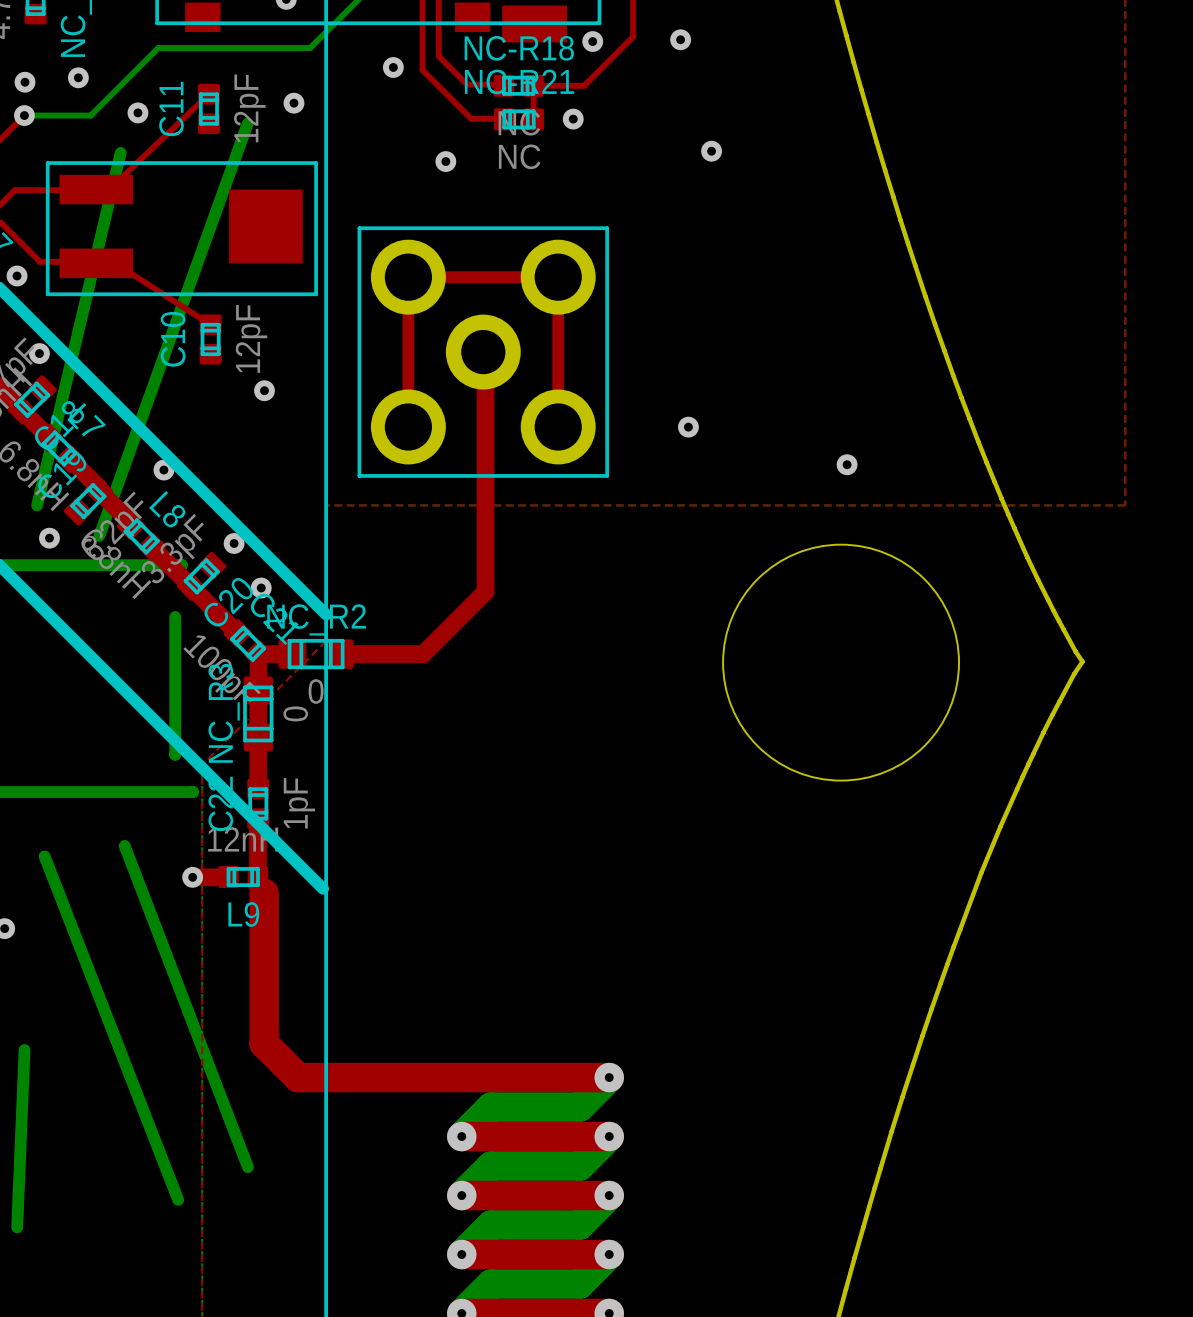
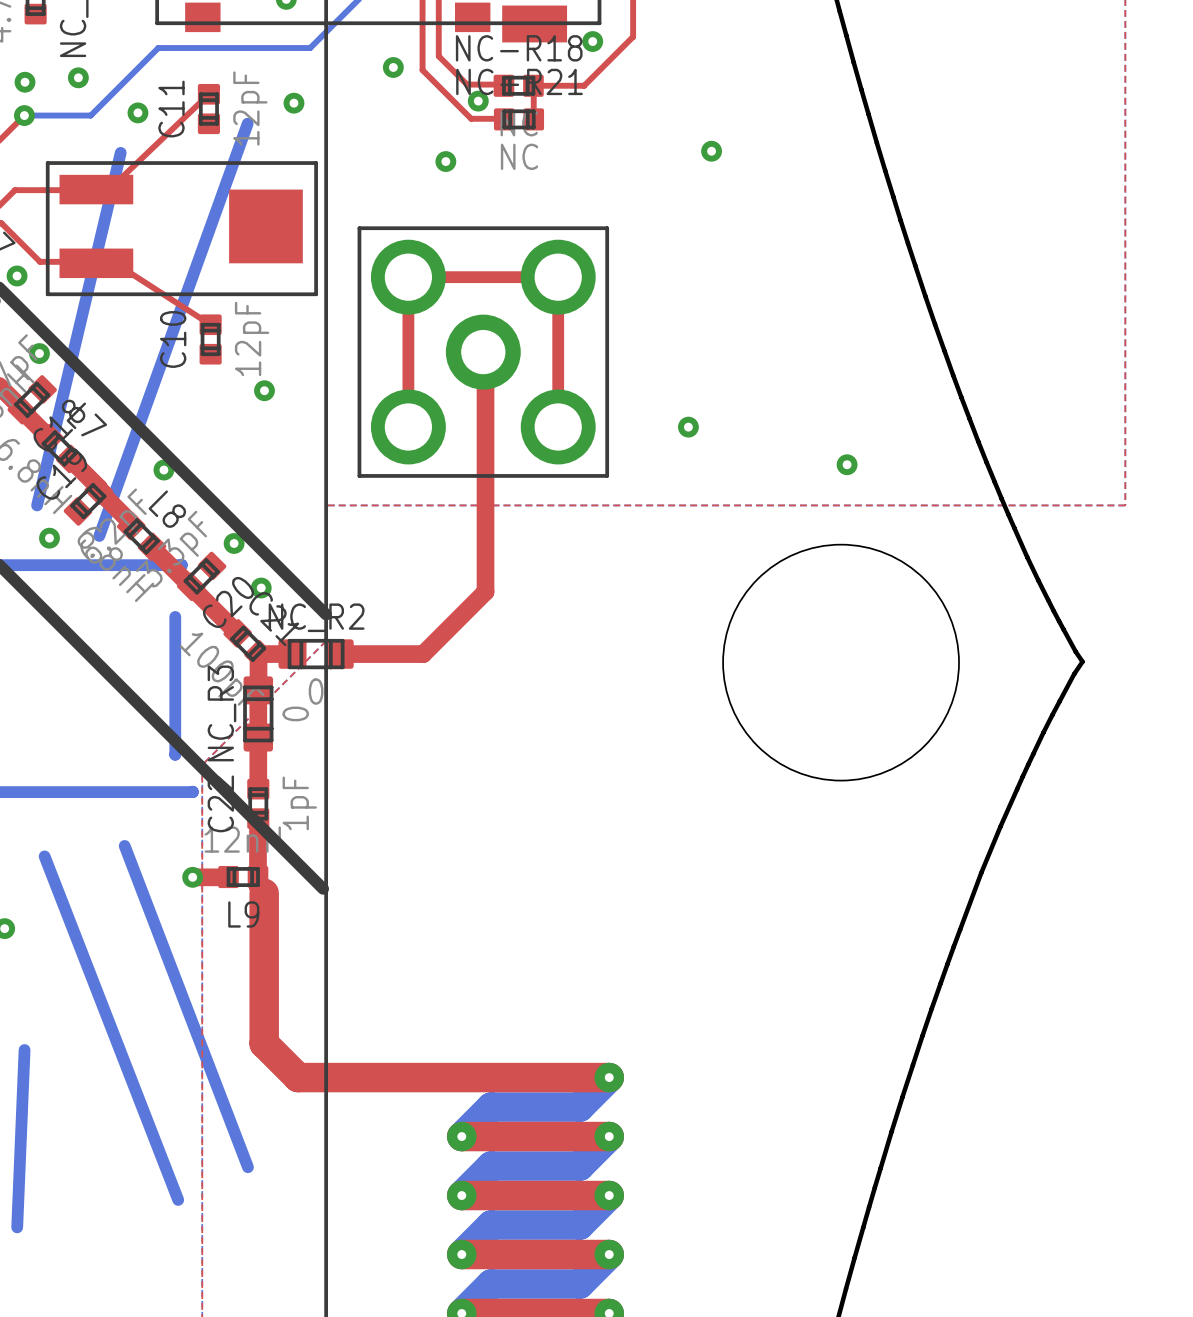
via: (680, 39) -> none
via position: (573, 119) -> (478, 101)

